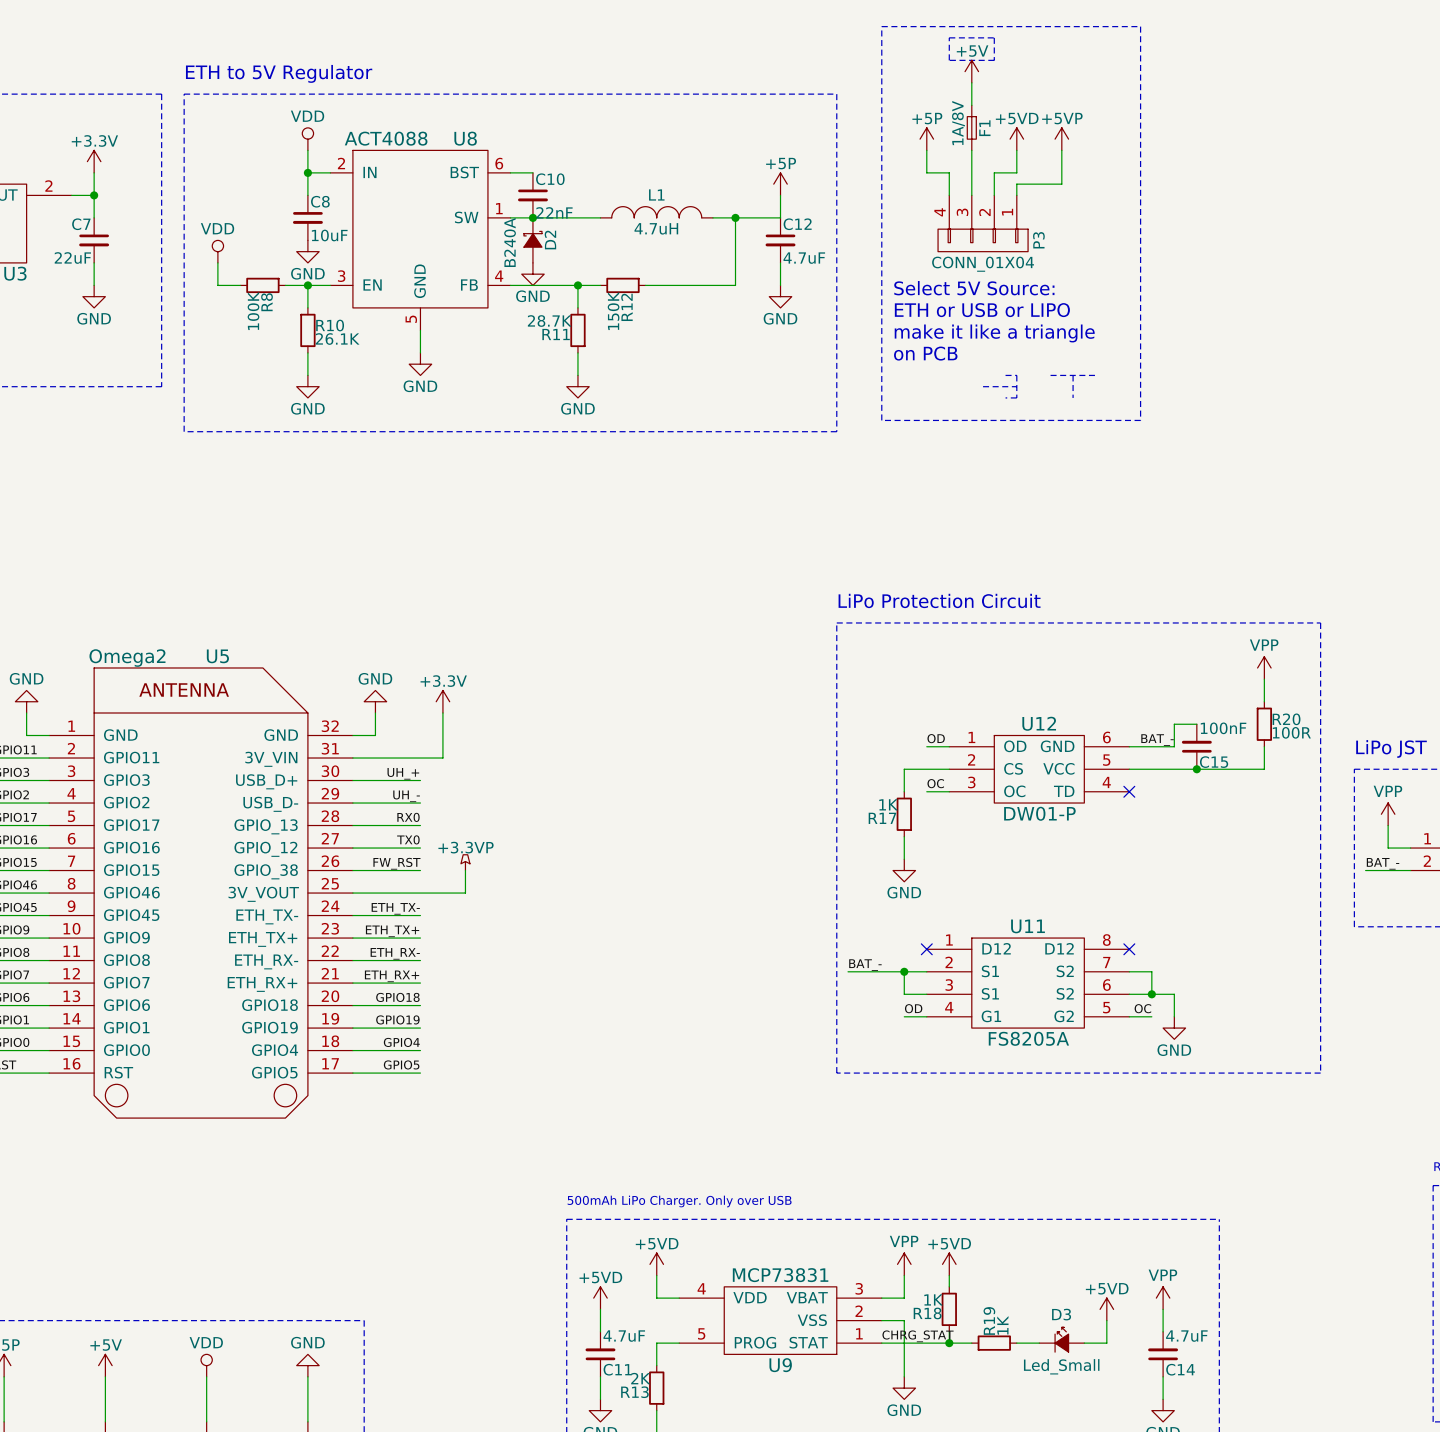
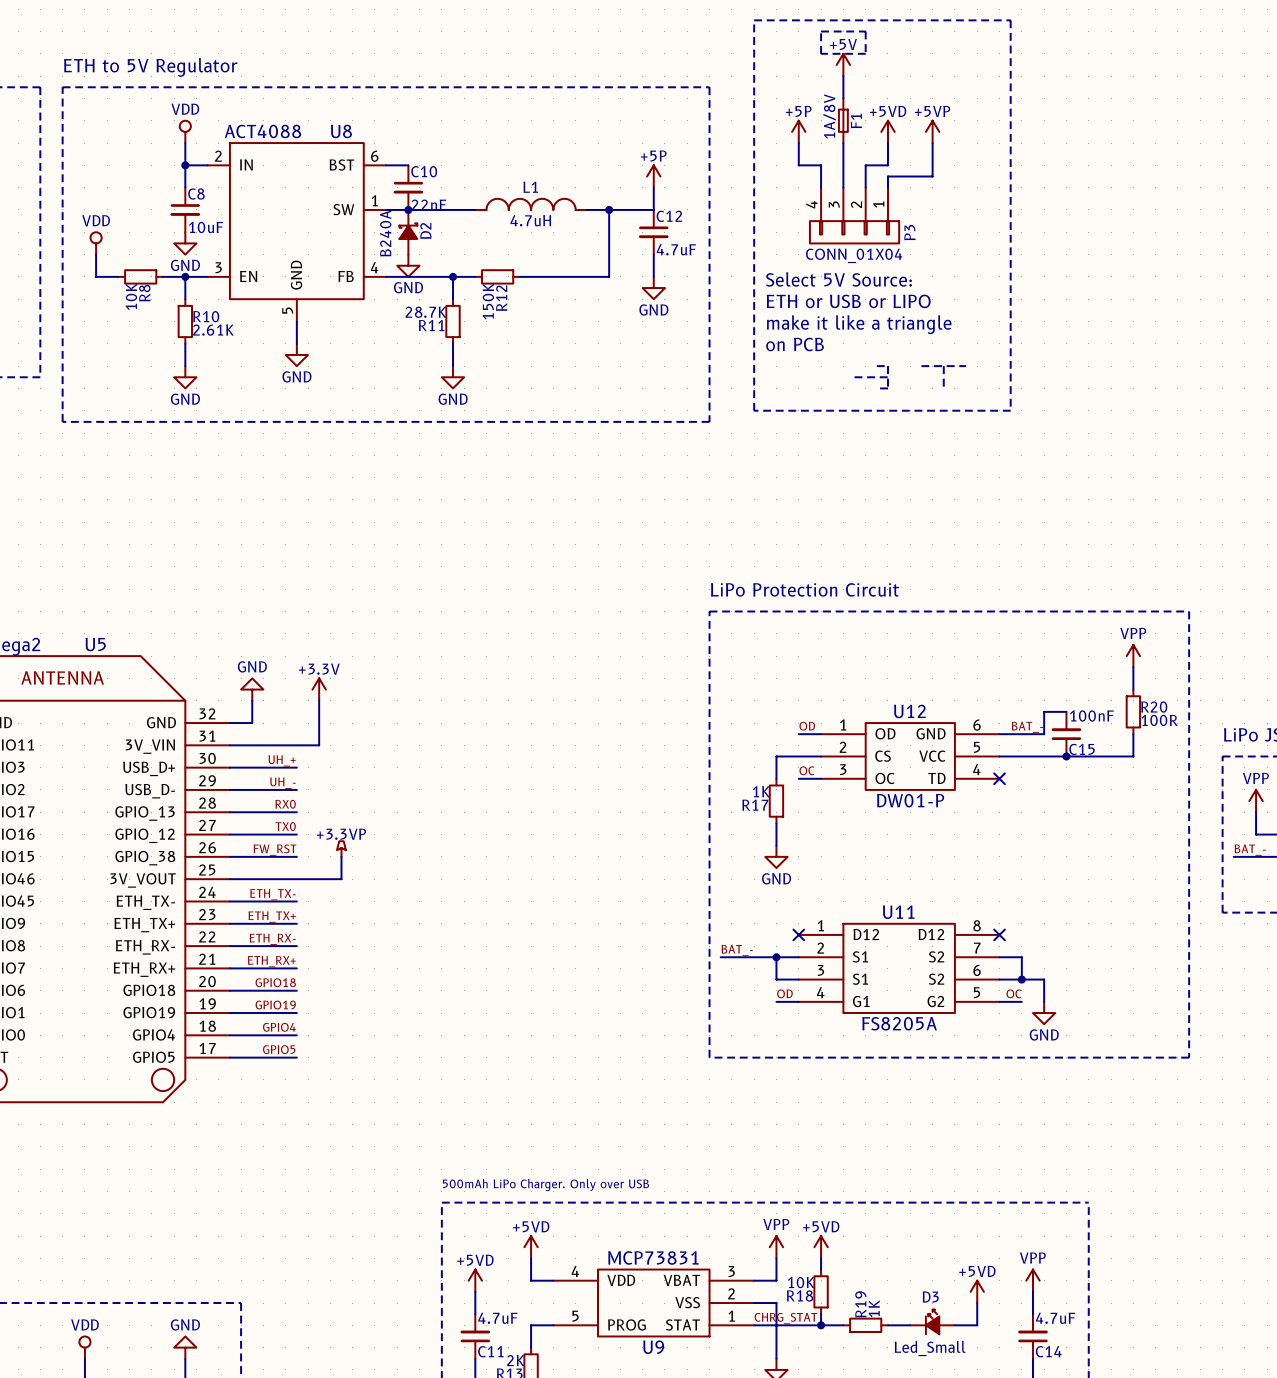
R8 value: 100K (253, 310) -> 10K (131, 296)
R10 value: 26.1K (337, 339) -> 2.61K (213, 330)
R18 value: 1K (933, 1299) -> 10K (801, 1282)

